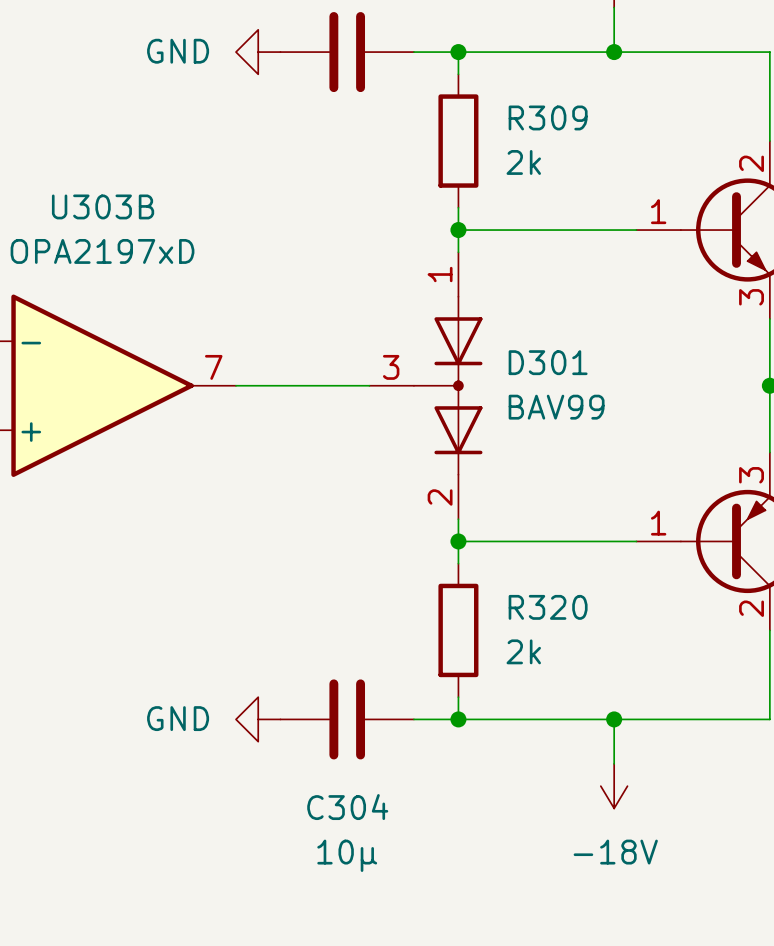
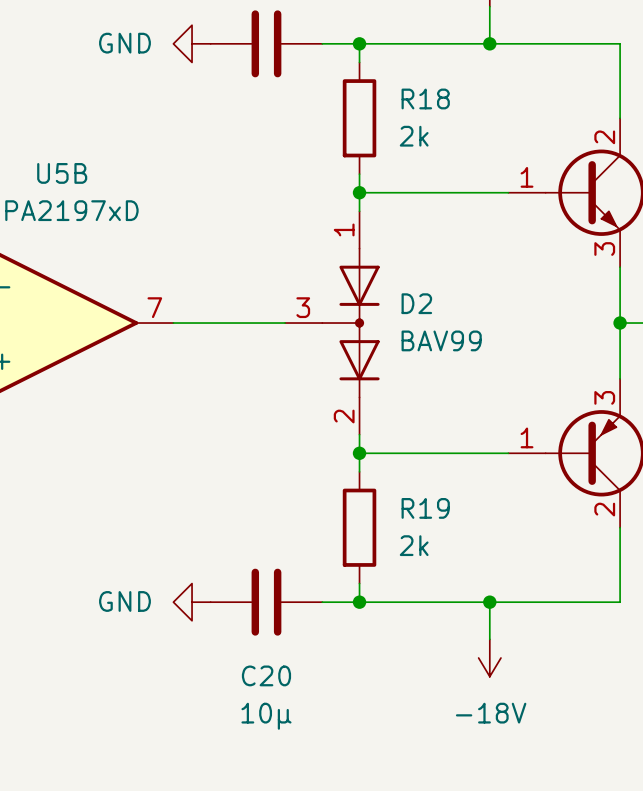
R309 name: R309 (548, 117) -> R18 (425, 98)
U303B name: U303B (103, 206) -> U5B (62, 173)
D301 name: D301 (548, 362) -> D2 (416, 303)
R320 name: R320 (548, 607) -> R19 (425, 508)
C304 name: C304 (347, 807) -> C20 (266, 675)

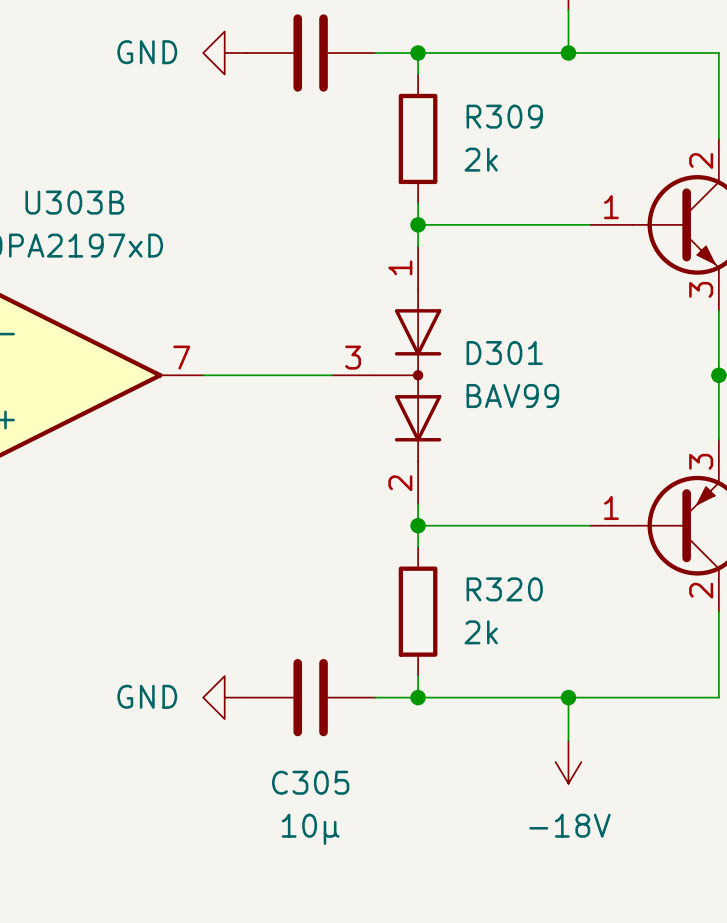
R18 name: R18 (425, 98) -> R309 (504, 116)
U5B name: U5B (62, 173) -> U303B (74, 202)
D2 name: D2 (416, 303) -> D301 (504, 353)
R19 name: R19 (425, 508) -> R320 (504, 589)
C20 name: C20 (266, 675) -> C305 (310, 782)

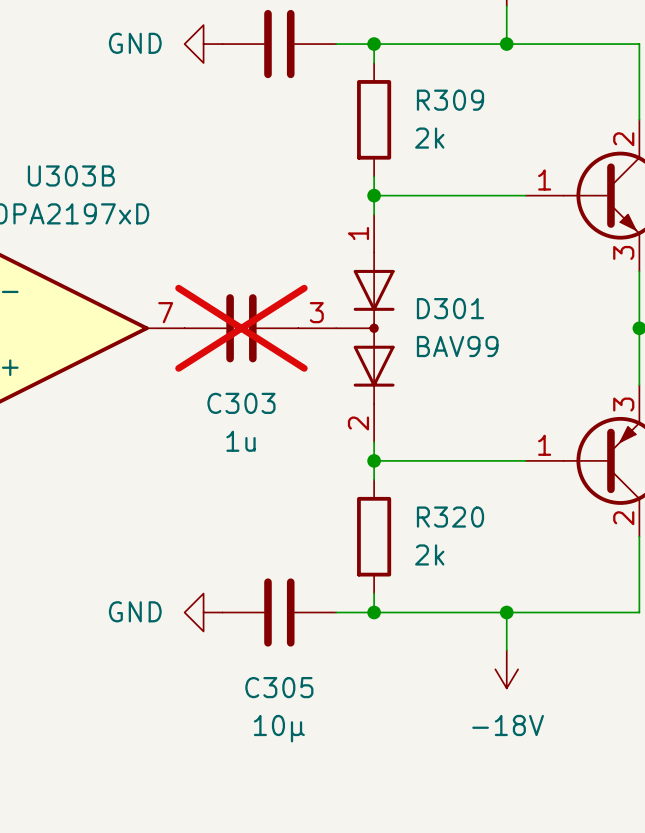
C303: none -> 1u (241, 328)

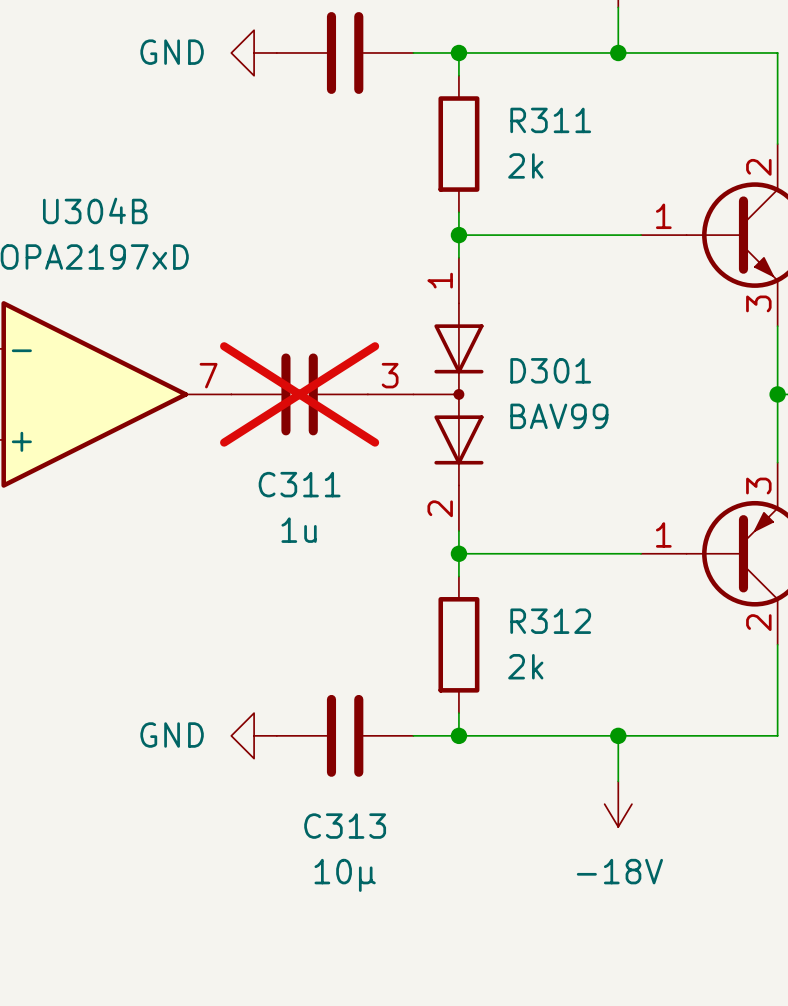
R309 name: R309 (450, 100) -> R311 (550, 120)
U303B name: U303B (71, 175) -> U304B (95, 210)
C303 name: C303 (241, 403) -> C311 (299, 484)
R320 name: R320 (450, 517) -> R312 (550, 621)
C305 name: C305 (279, 687) -> C313 (345, 826)

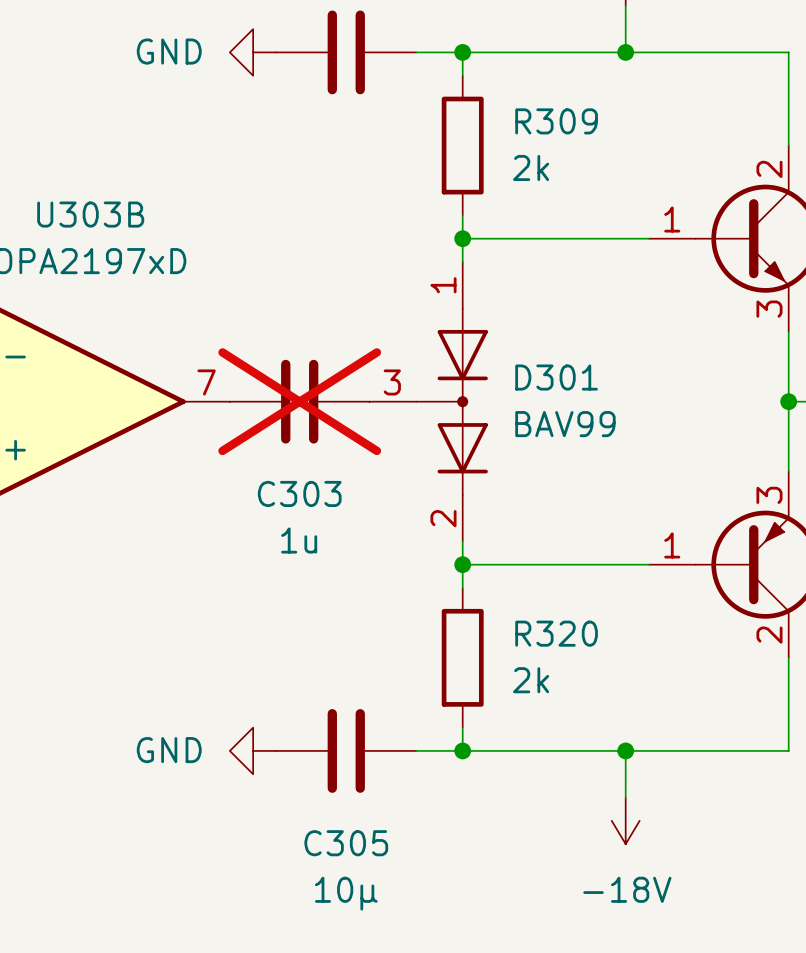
R311 name: R311 (550, 120) -> R309 (556, 121)
U304B name: U304B (95, 210) -> U303B (90, 214)
C311 name: C311 (299, 484) -> C303 (299, 493)
R312 name: R312 (550, 621) -> R320 (556, 633)
C313 name: C313 (345, 826) -> C305 (346, 843)

